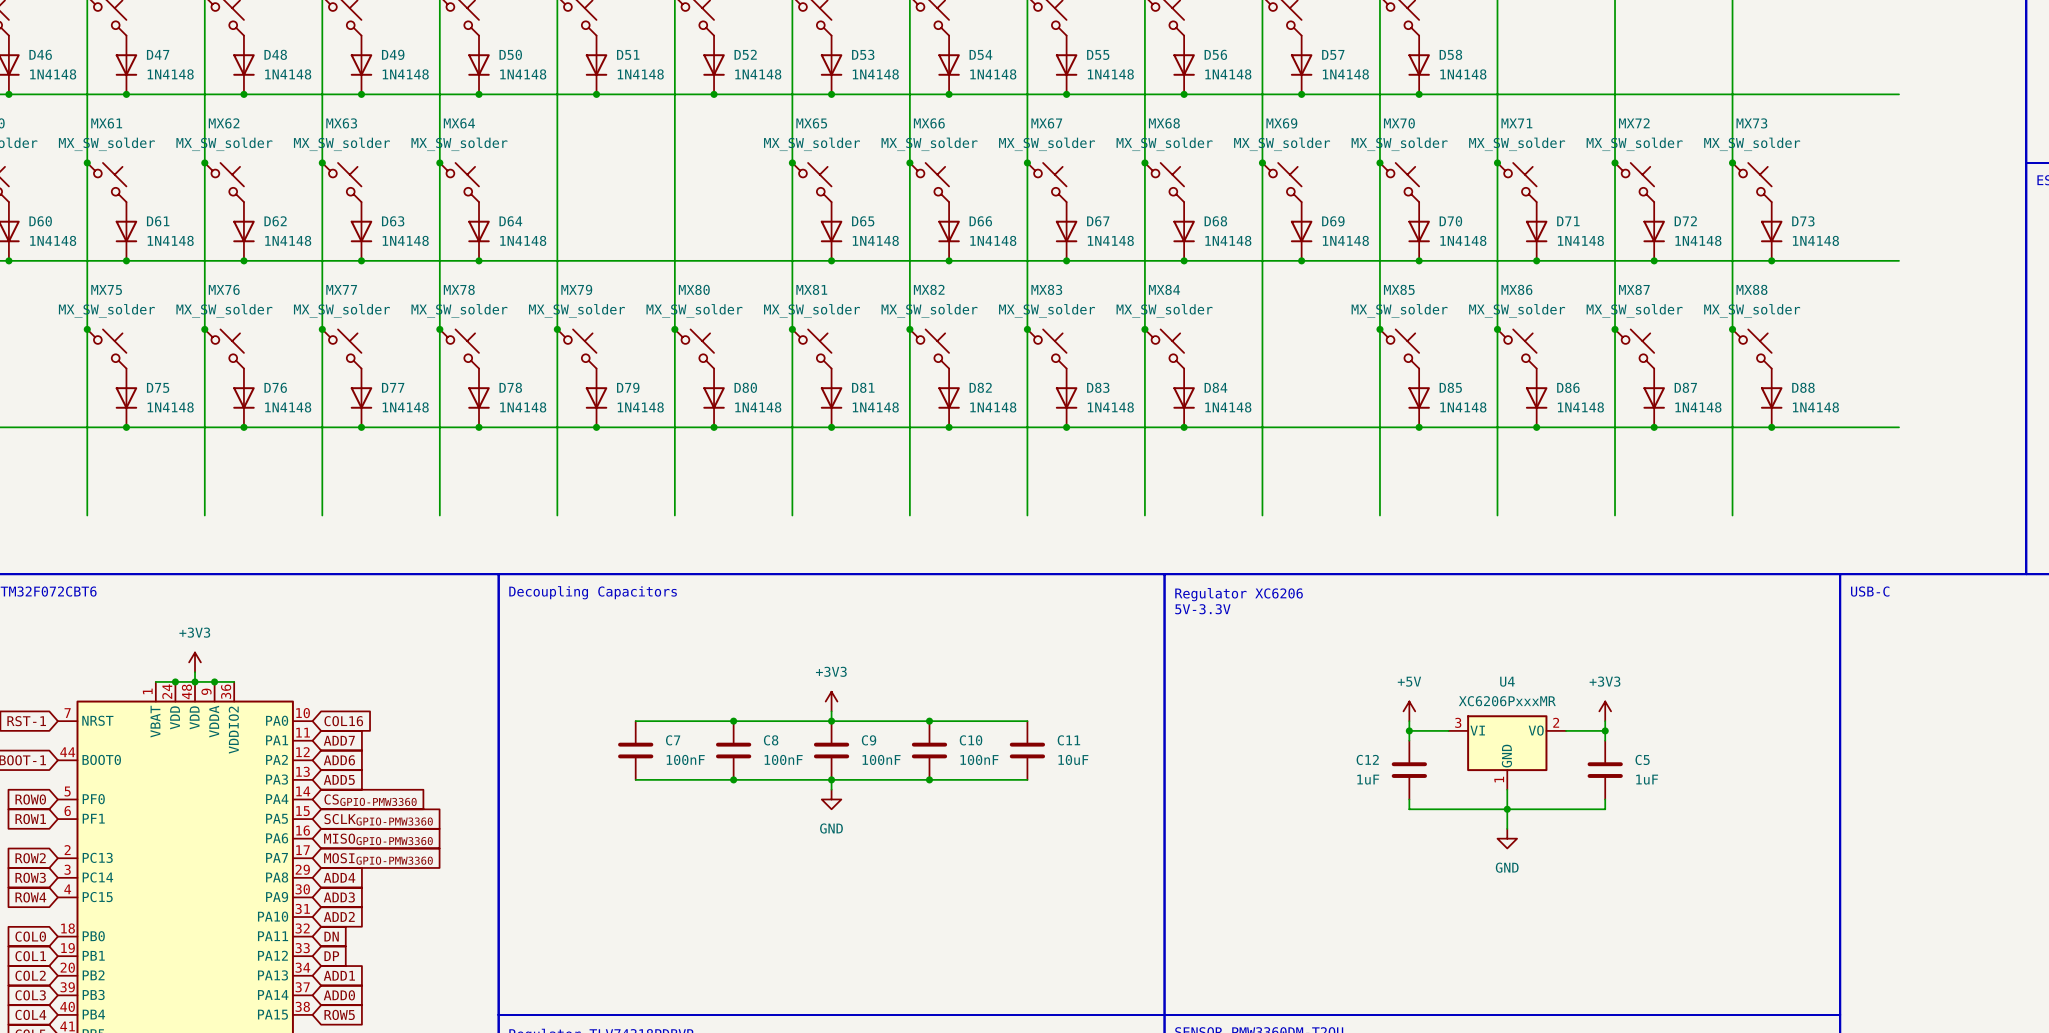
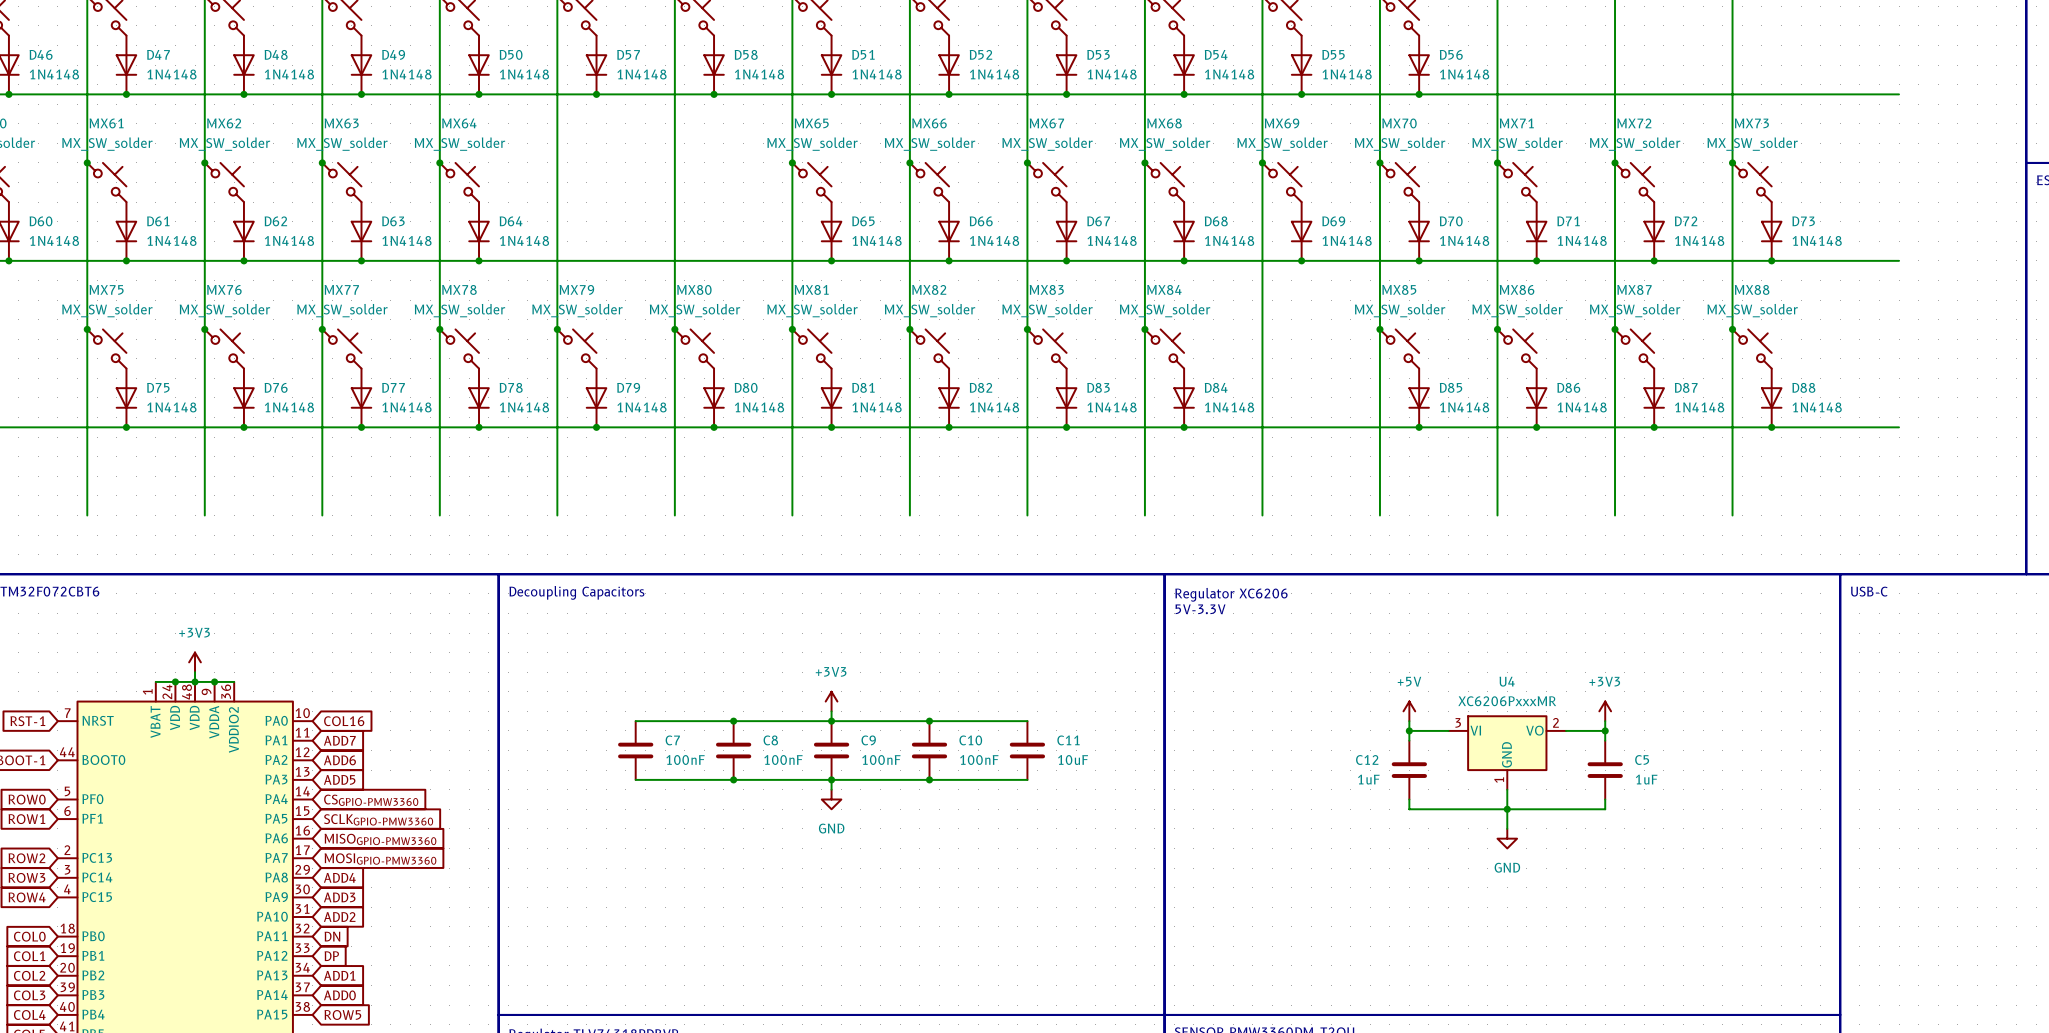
D51 name: D51 (628, 54) -> D57 (628, 54)
D52 name: D52 (745, 54) -> D58 (746, 54)
D53 name: D53 (863, 54) -> D51 (863, 54)
D54 name: D54 (980, 54) -> D52 (980, 54)
D55 name: D55 (1098, 54) -> D53 (1098, 54)
D56 name: D56 (1215, 54) -> D54 (1216, 54)
D57 name: D57 (1333, 54) -> D55 (1333, 54)
D58 name: D58 (1450, 54) -> D56 (1451, 54)

